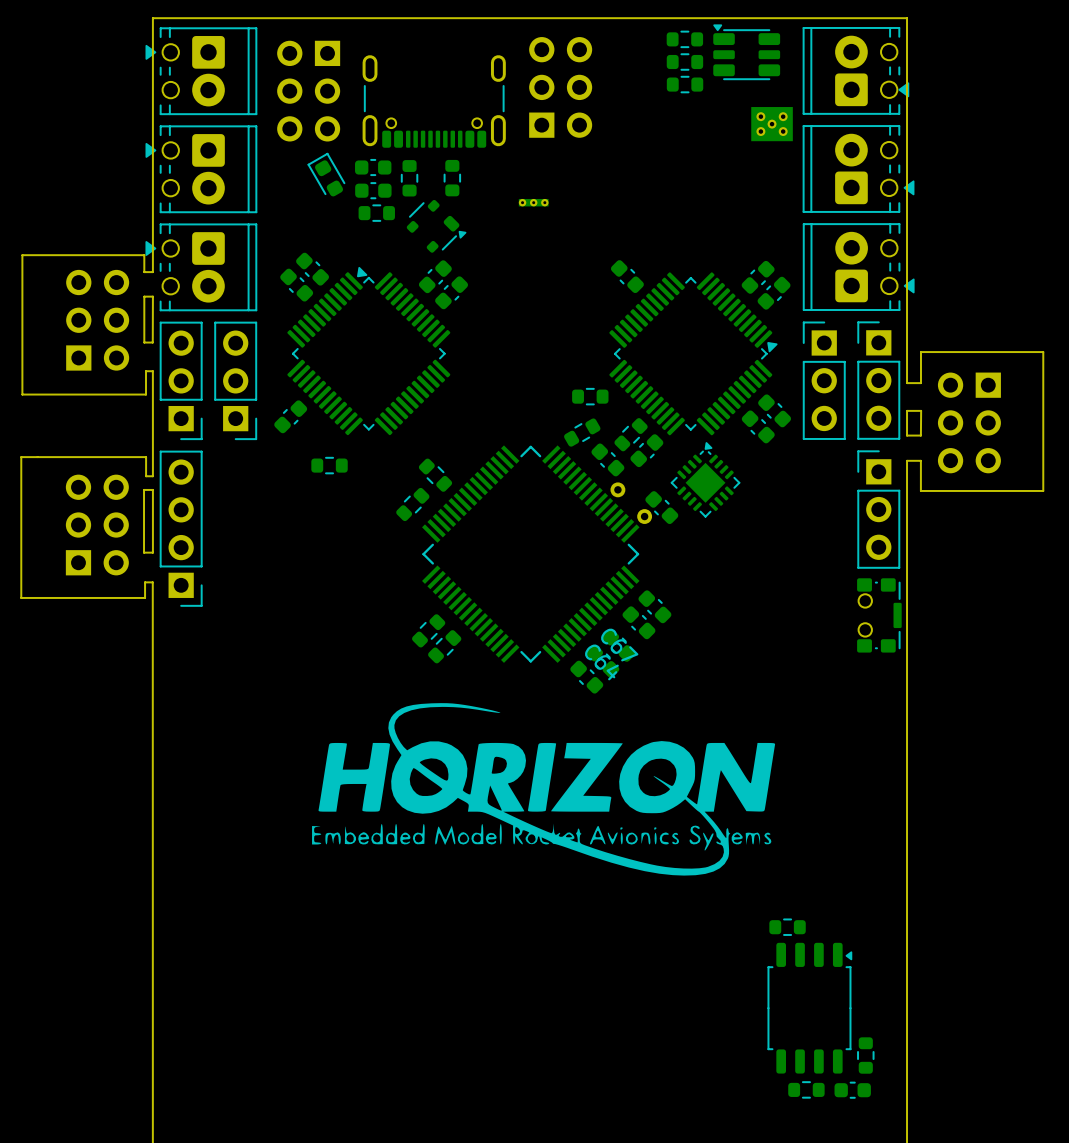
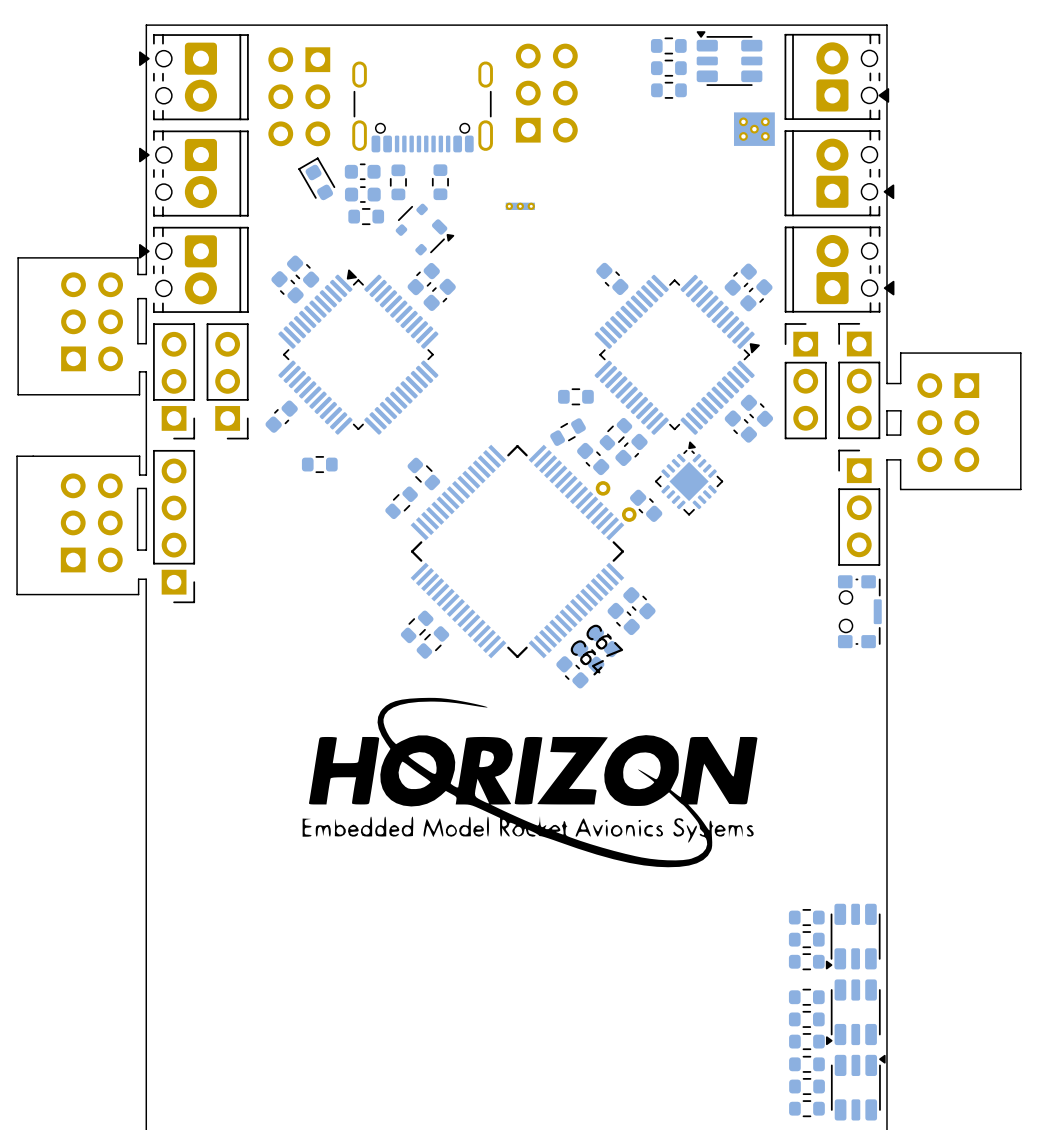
part: none -> (806, 917)
part: (787, 927) -> none
part: none -> (853, 936)
part: none -> (806, 939)
part: none -> (806, 961)
part: none -> (806, 997)
part: (809, 1008) -> none
part: none -> (853, 1012)
part: none -> (806, 1019)
part: none -> (806, 1041)
part: (865, 1055) -> none
part: none -> (806, 1064)
part: (806, 1089) -> none
part: (852, 1090) -> none
part: none -> (807, 1086)
part: none -> (858, 1087)
part: none -> (806, 1108)

